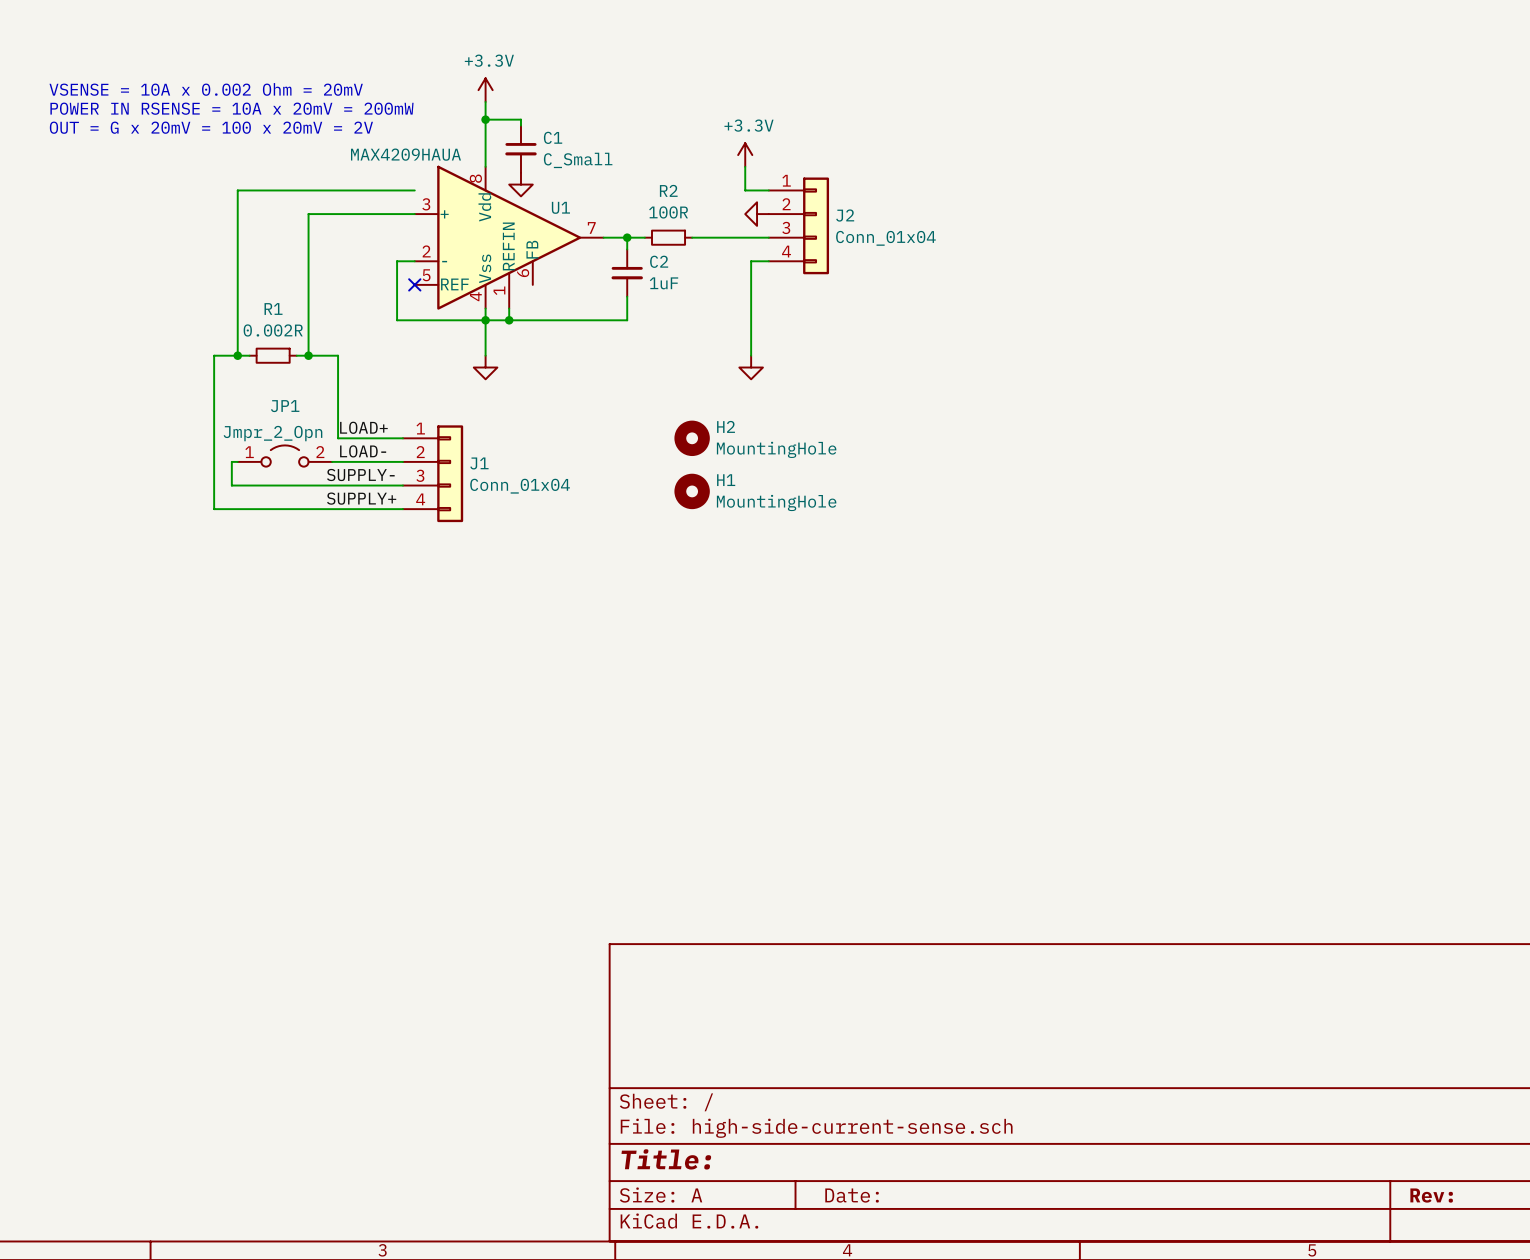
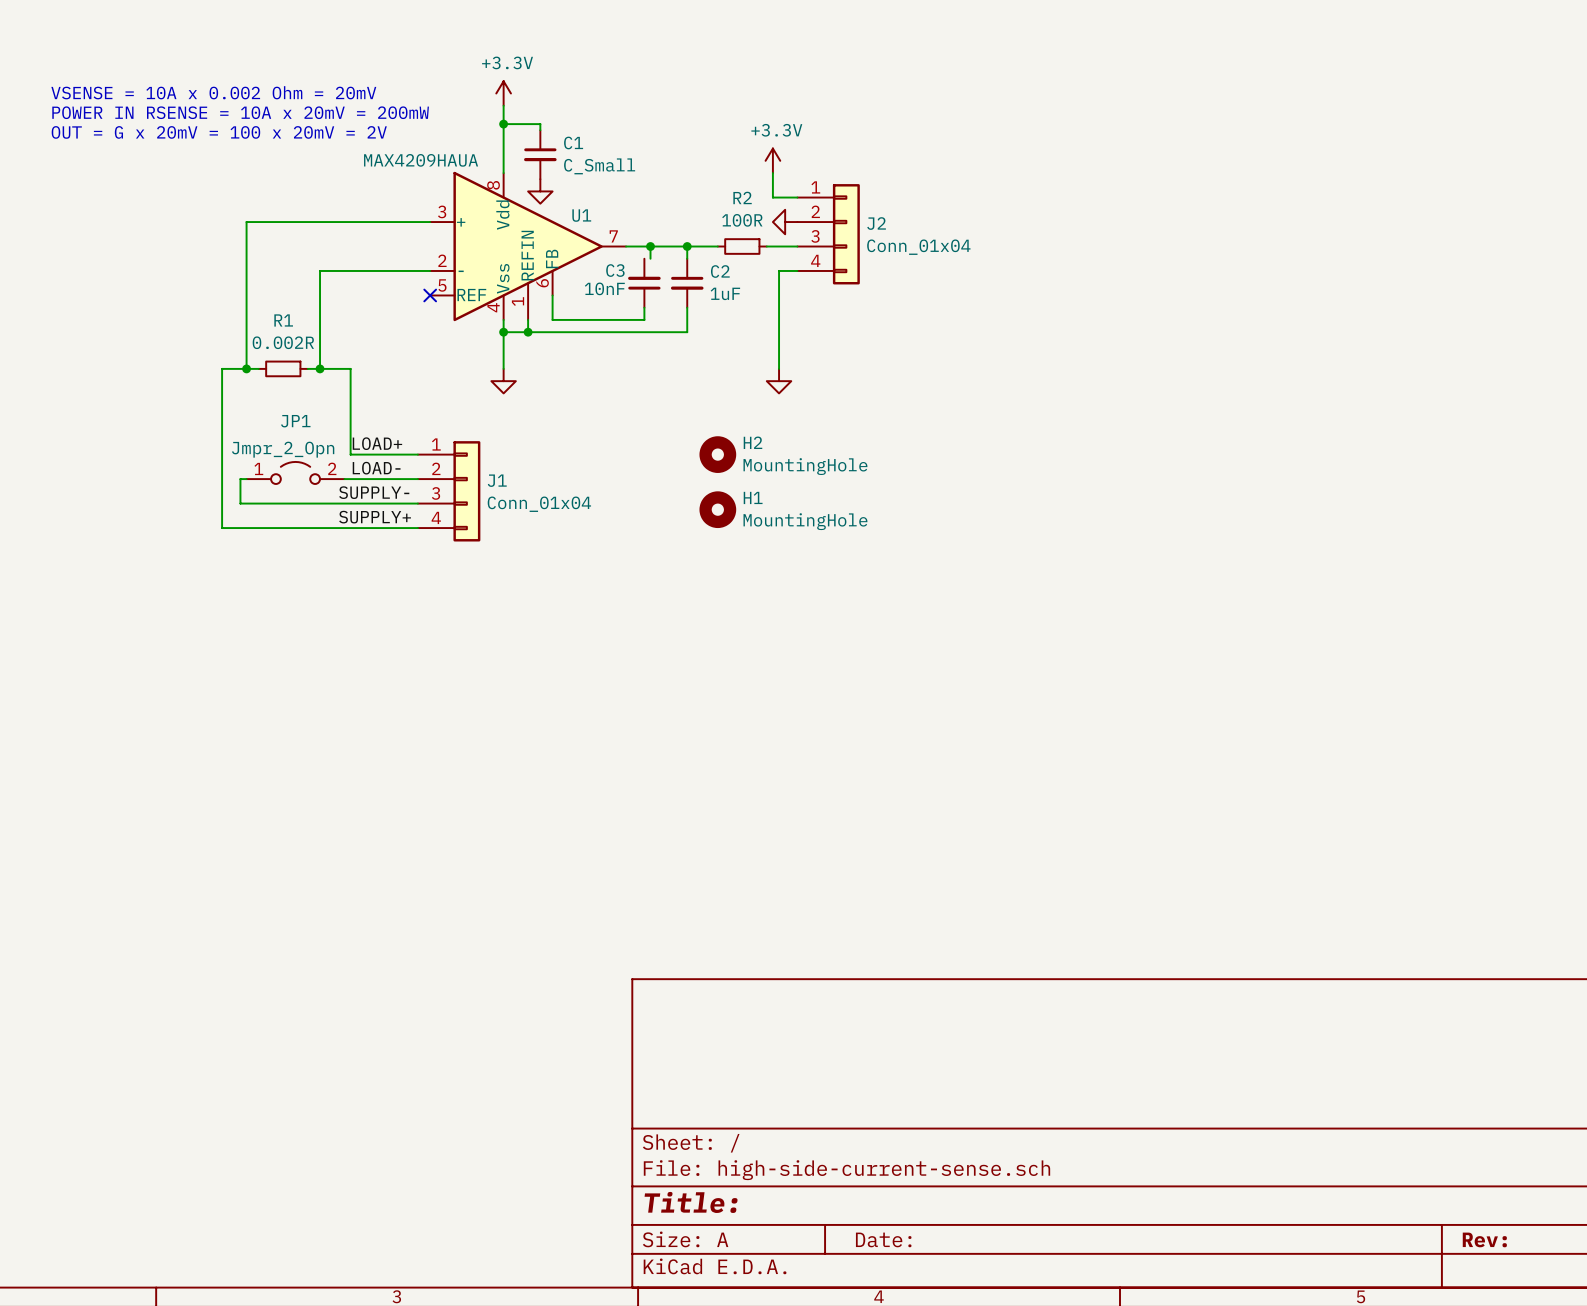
wire: (414, 190) (237, 190) (237, 214) -> none
wire: (308, 214) (308, 261) -> (320, 222) (246, 222)
wire: none -> (687, 246) (687, 258)
junction: none -> (687, 246)
R2 position: (668, 237) -> (742, 246)
wire: (692, 237) (739, 237) -> (717, 246) (668, 246)
wire: (397, 261) (397, 320) (485, 320) -> (411, 270) (320, 270)
C3: none -> 10nF (644, 283)
C2 position: (627, 273) -> (687, 283)
wire: none -> (552, 295) (552, 319) (644, 319) (644, 307)
wire: (627, 296) (627, 320) -> (687, 307) (687, 332) (650, 332)

